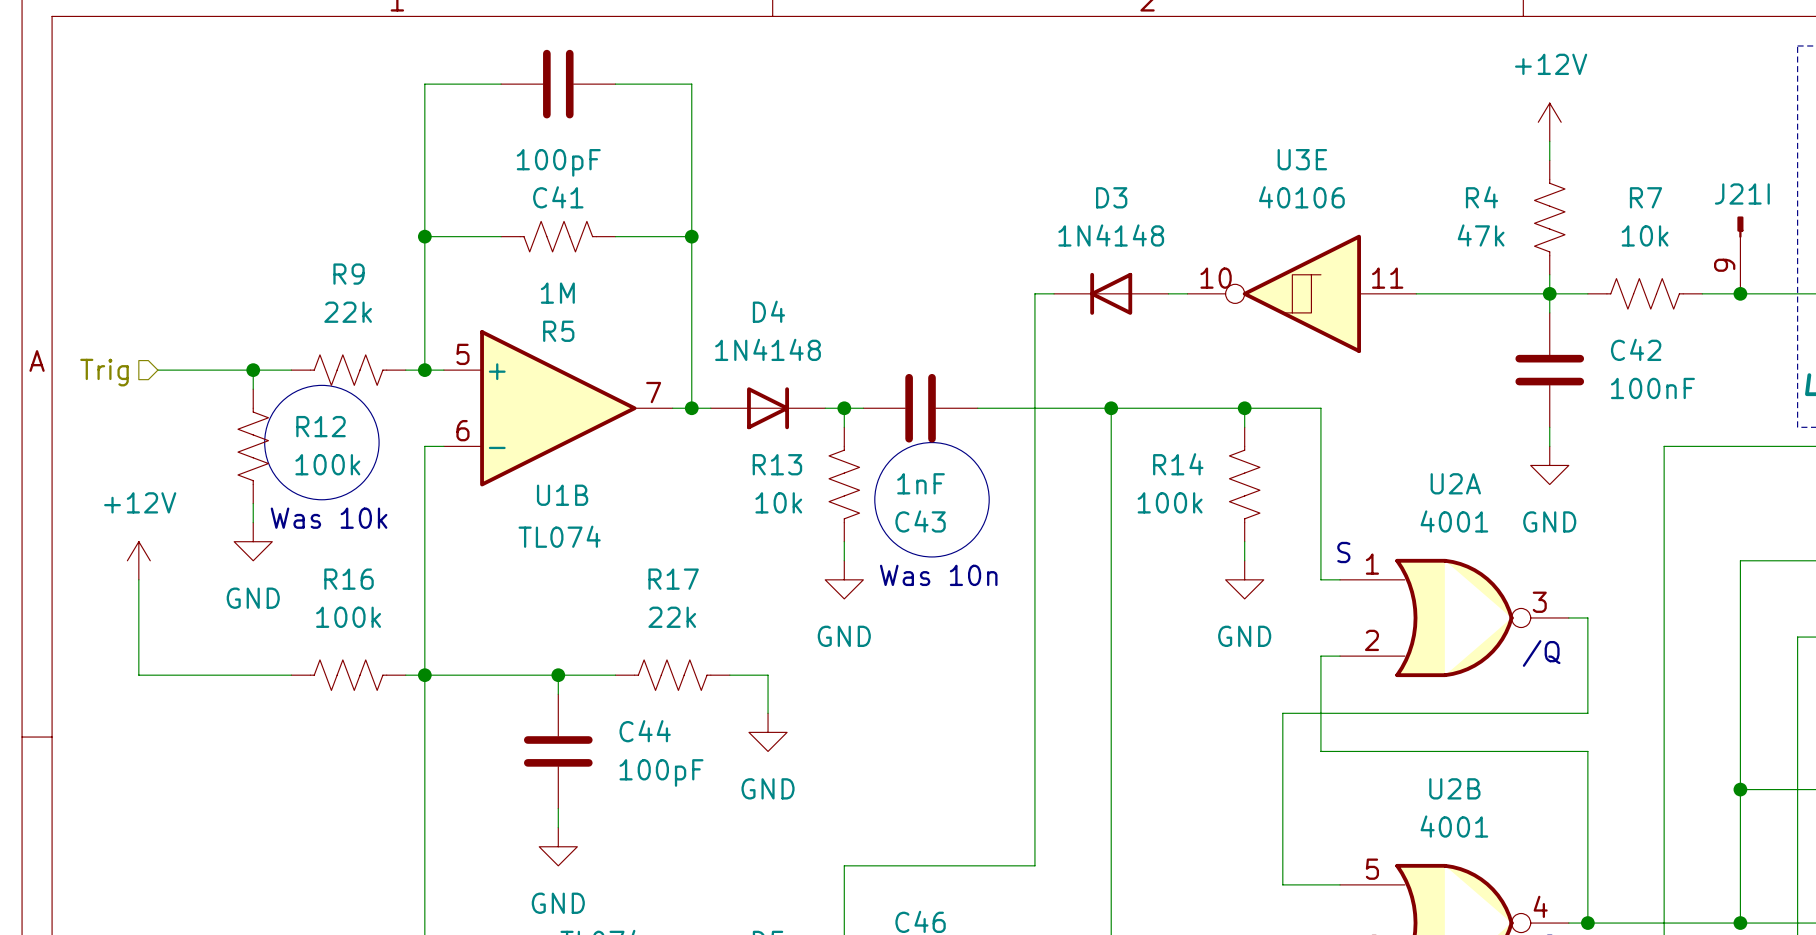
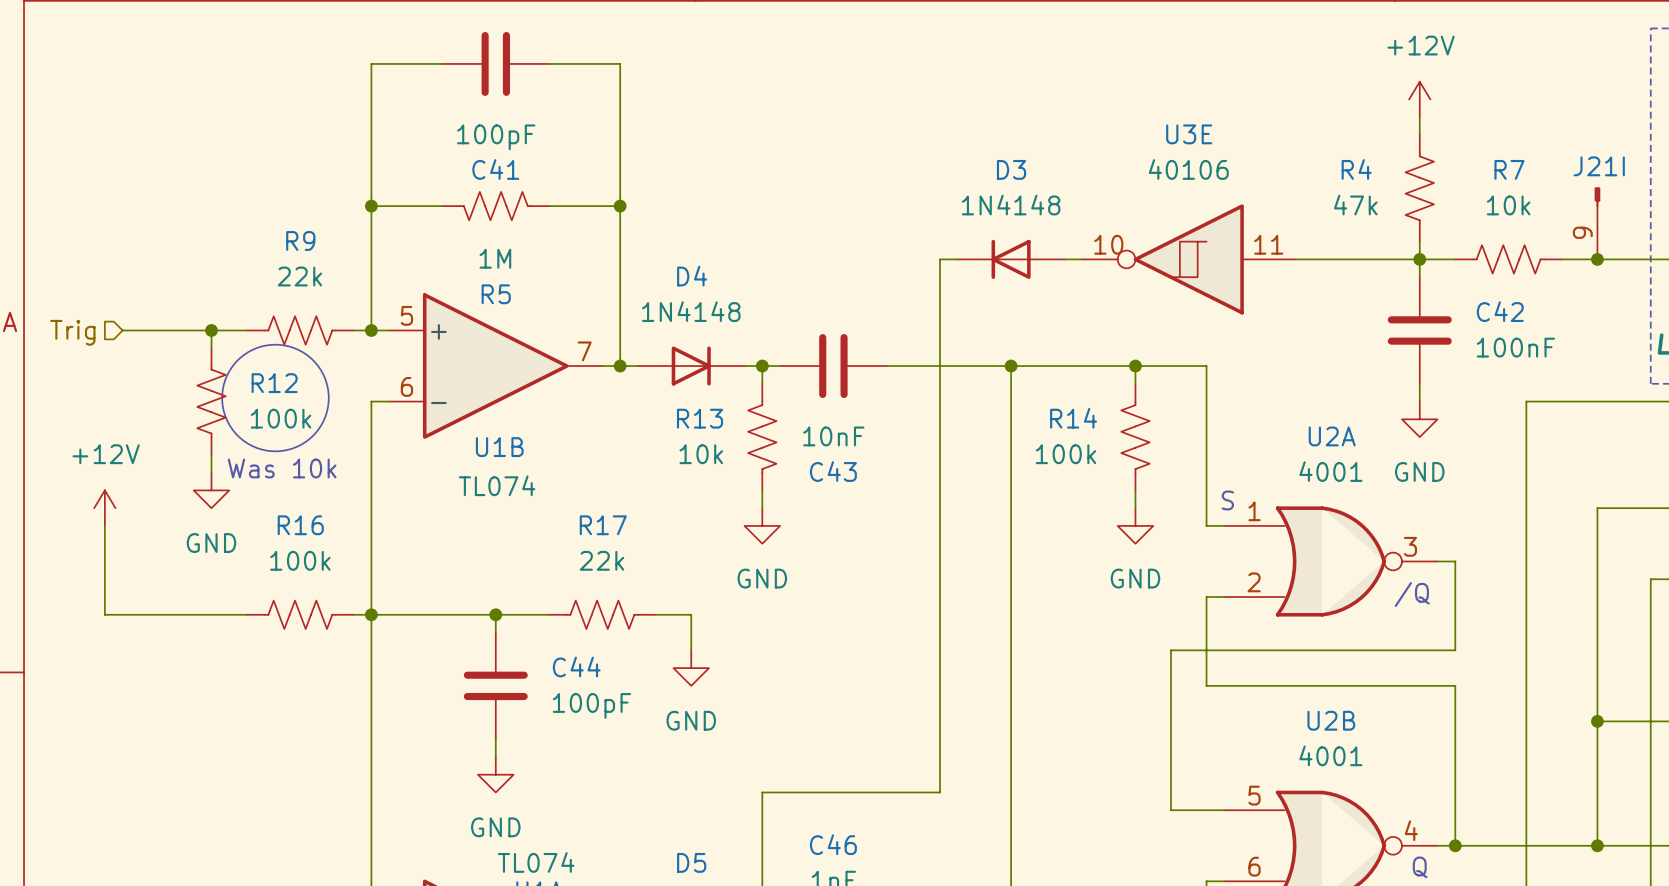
drawing: [874, 442, 990, 557] -> none
C43 value: 1nF (921, 483) -> 10nF (833, 436)
text: Was 10n (938, 575) -> none

